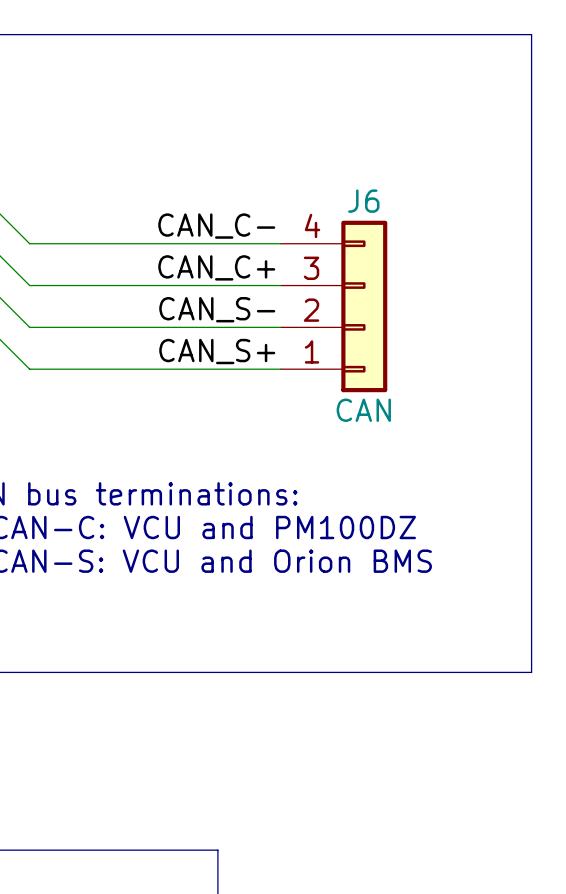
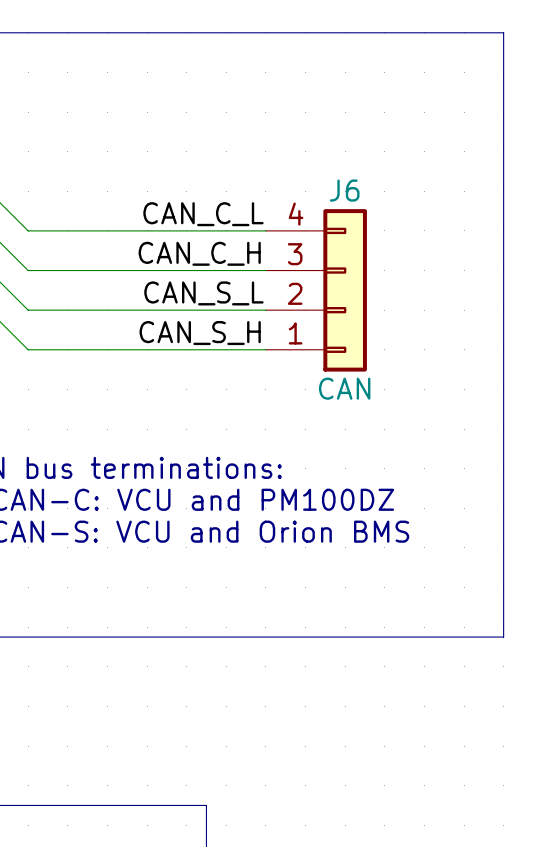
label: CAN_C- (216, 226) -> CAN_C_L (203, 214)
label: CAN_C+ (216, 267) -> CAN_C_H (199, 253)
label: CAN_S- (217, 309) -> CAN_S_L (203, 293)
label: CAN_S+ (217, 351) -> CAN_S_H (200, 333)

